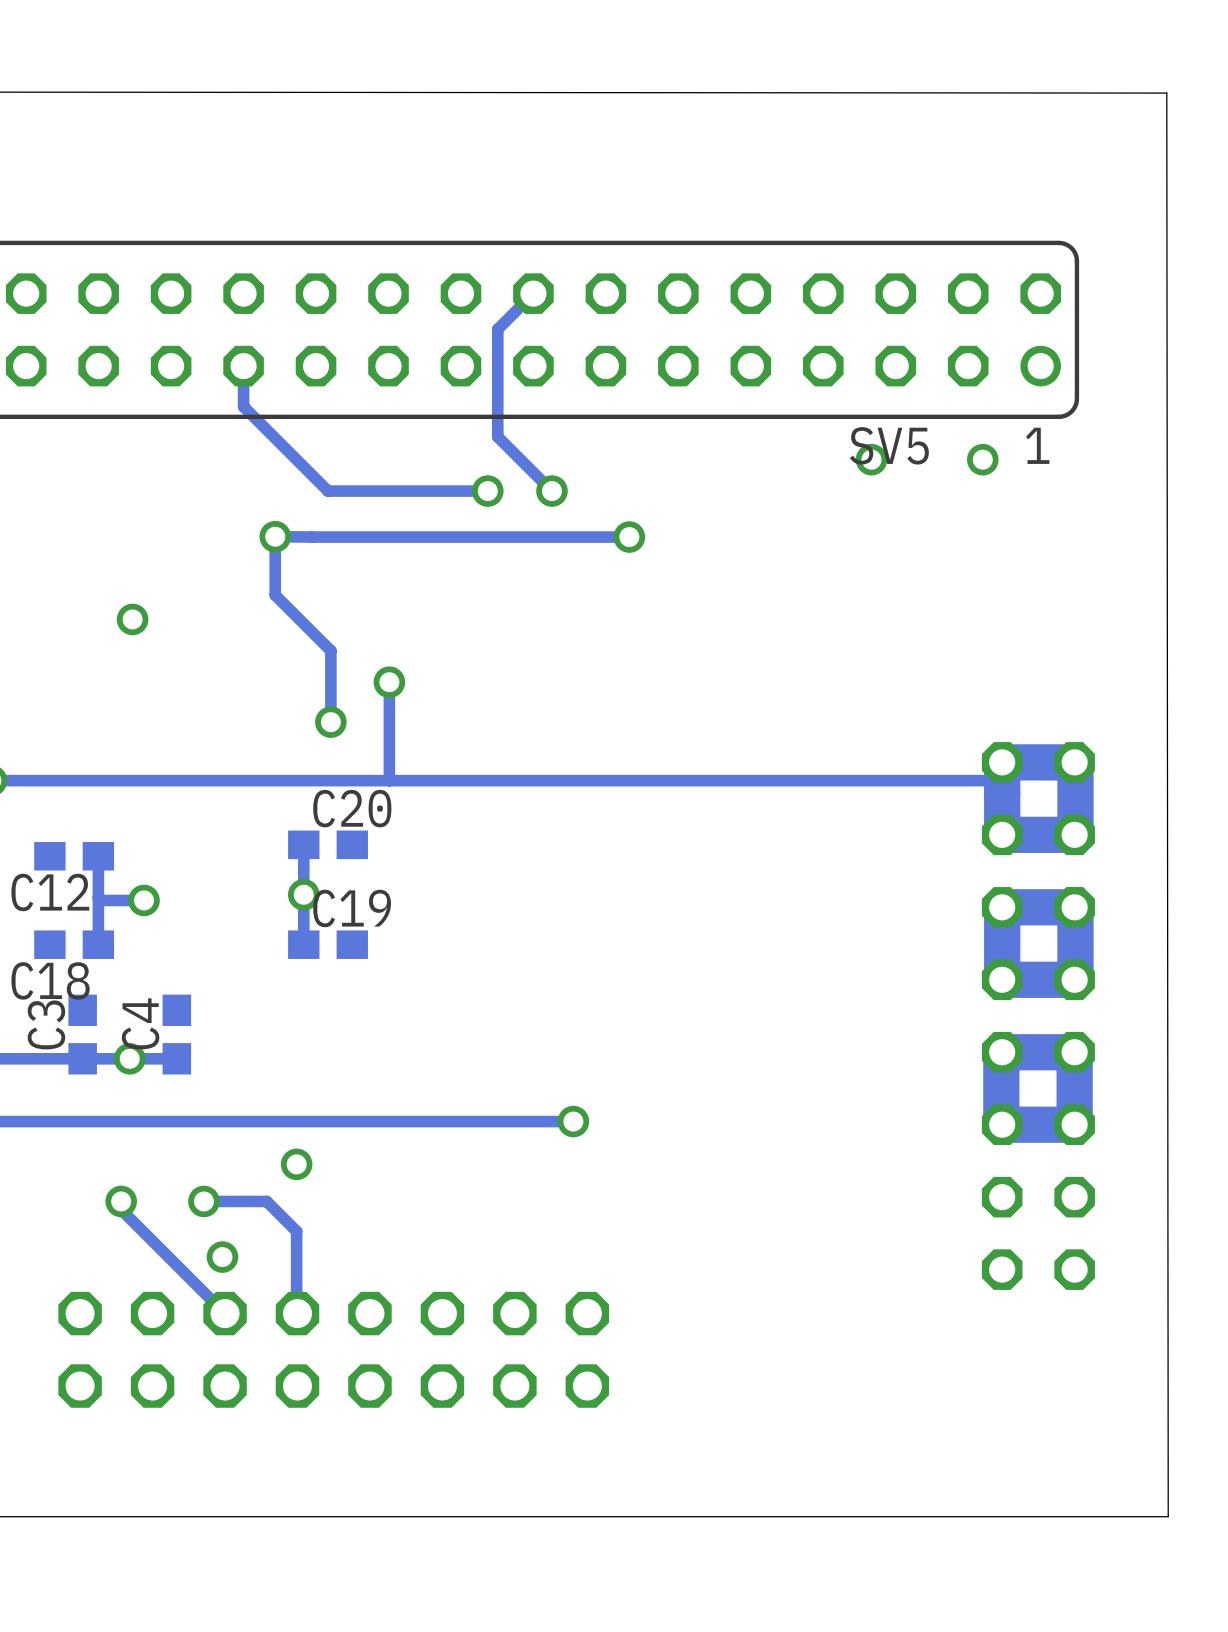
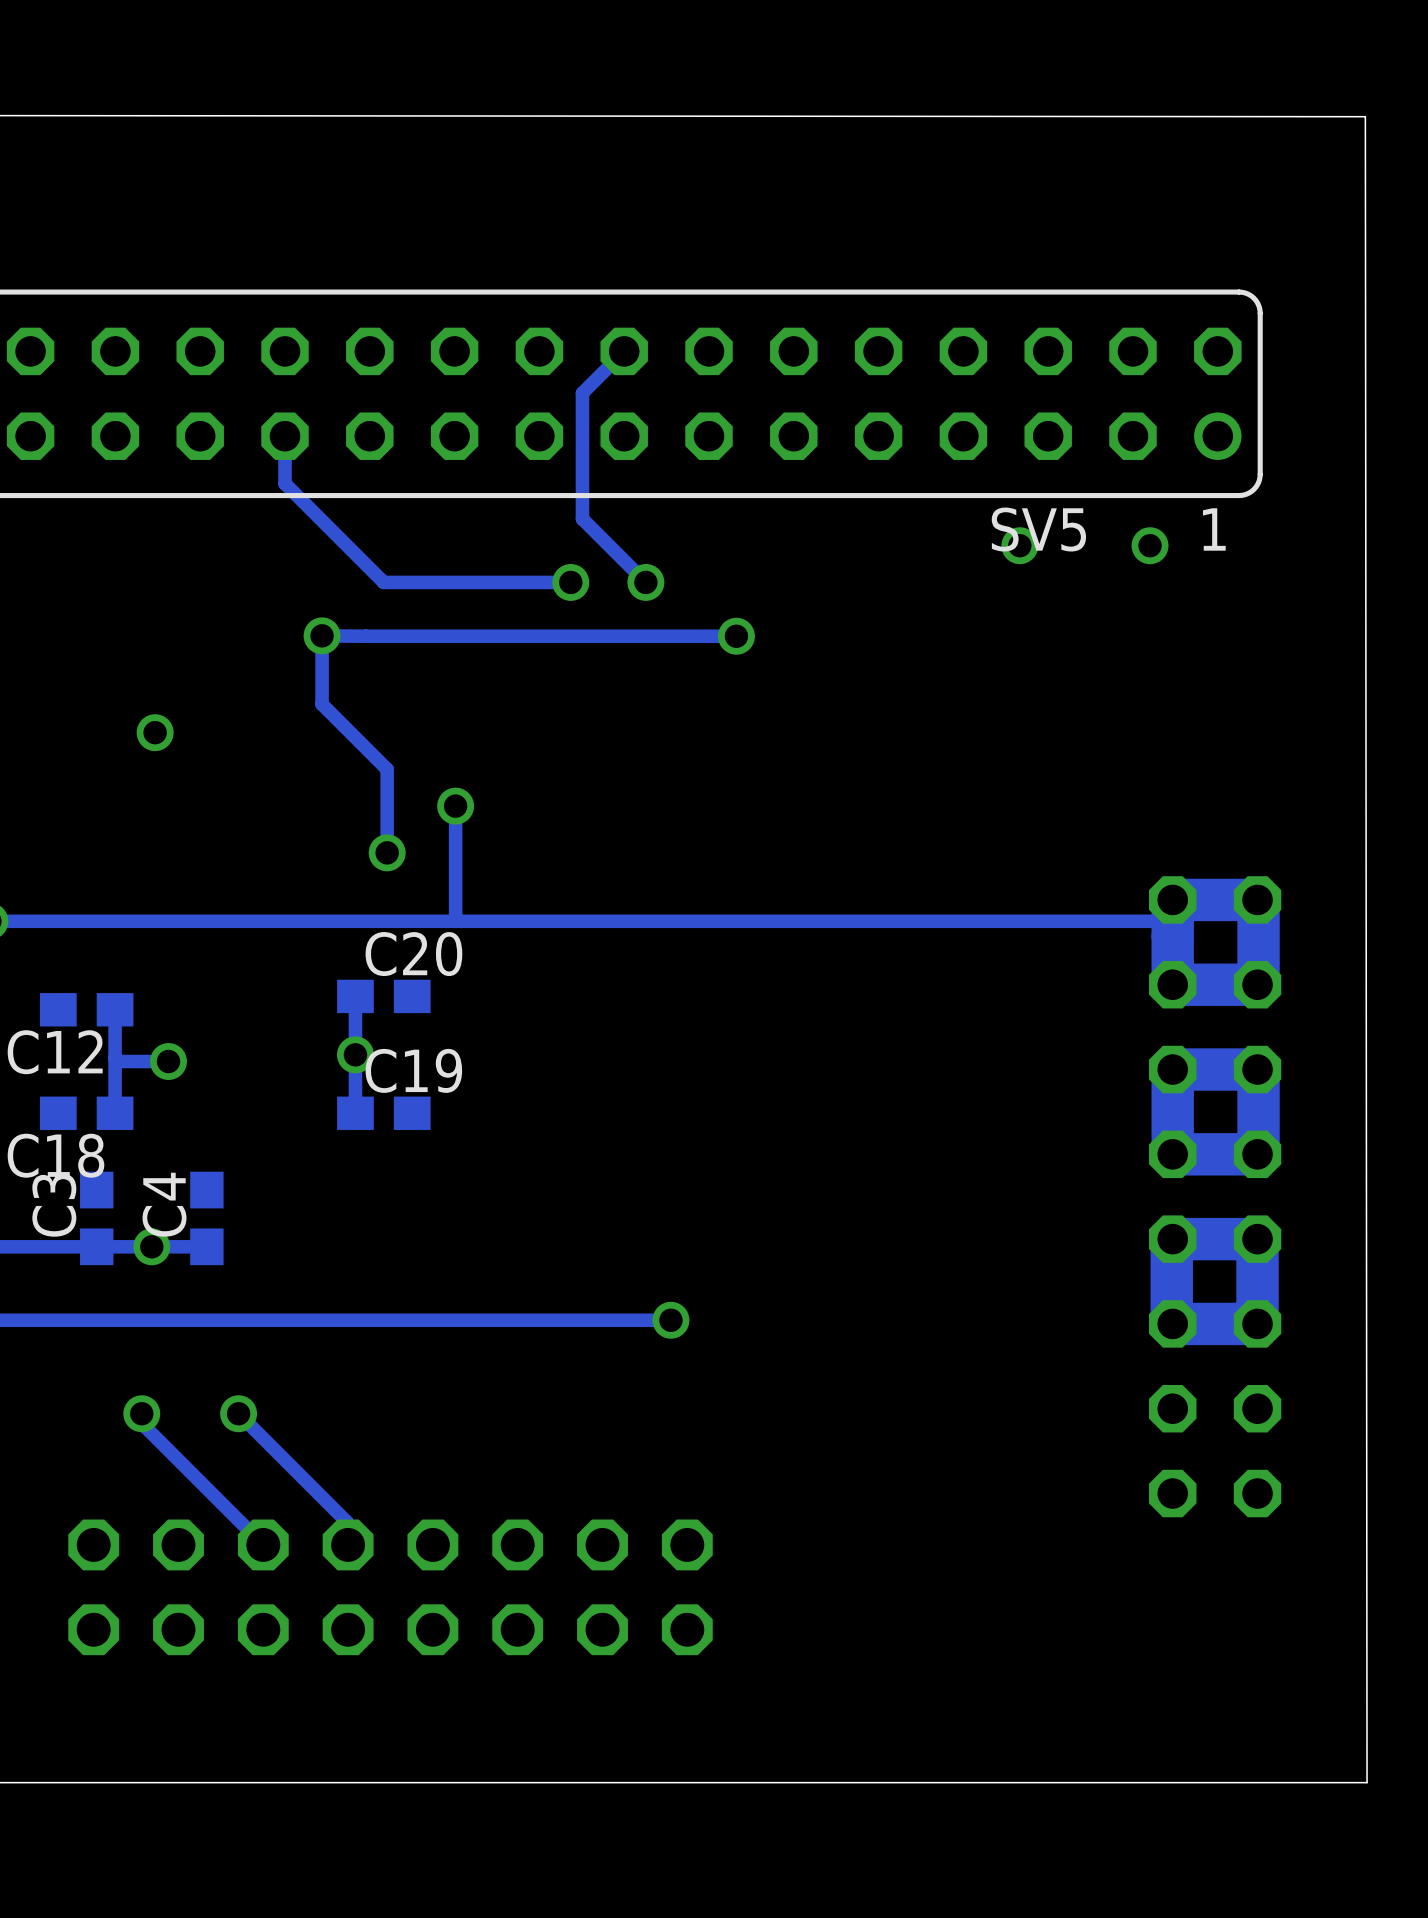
via: (296, 1164) -> none
track: (203, 1201) (266, 1201) (296, 1231) (296, 1294) -> (238, 1413) (347, 1522)
via: (222, 1257) -> none

